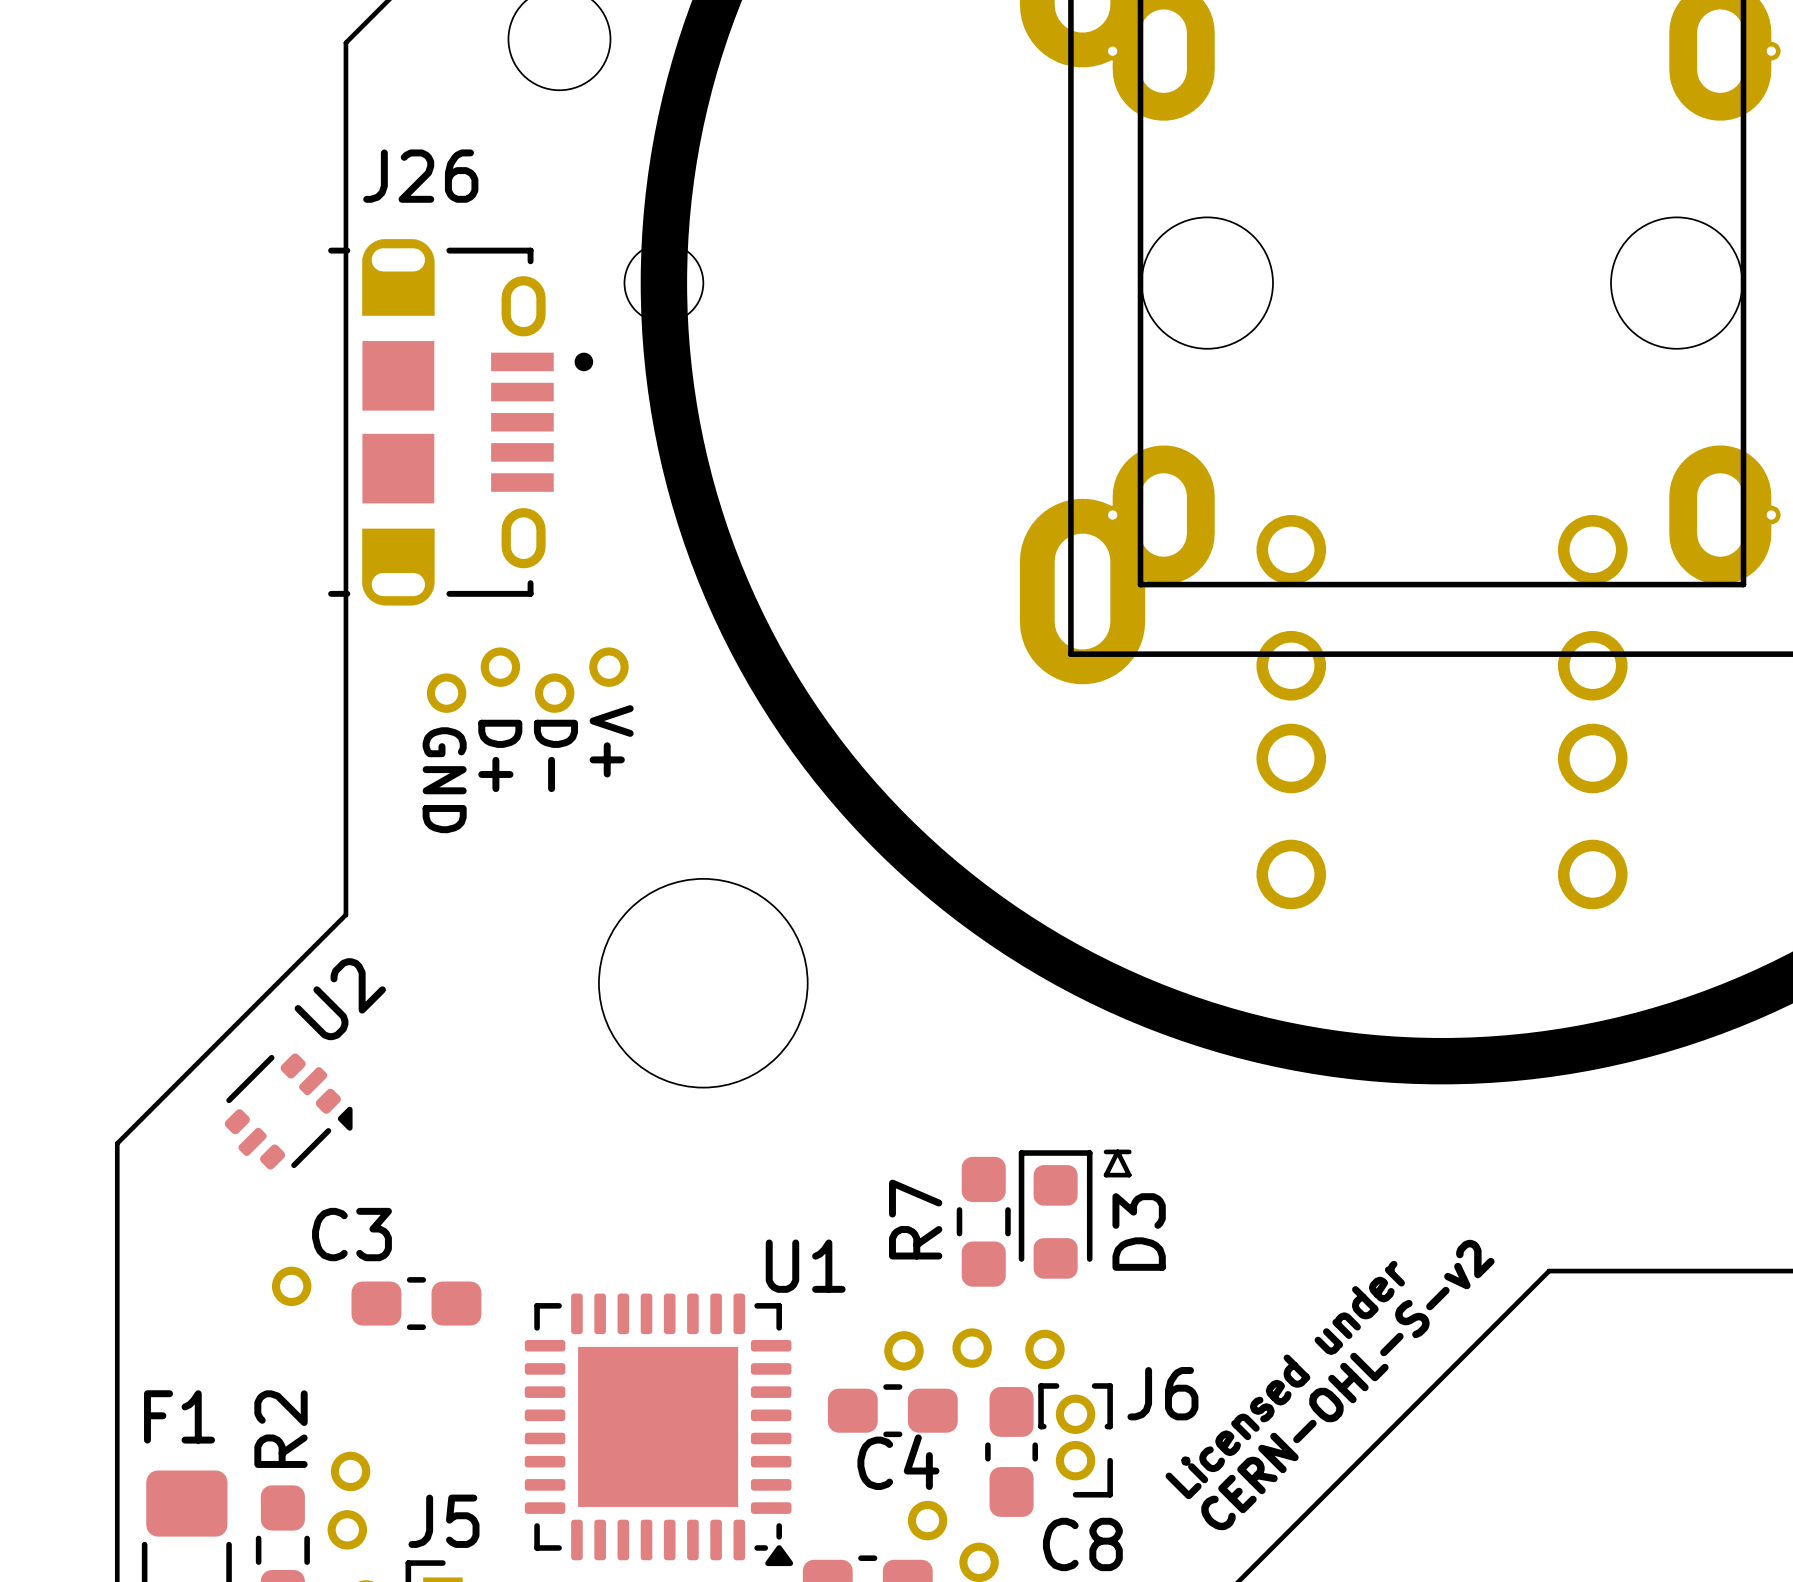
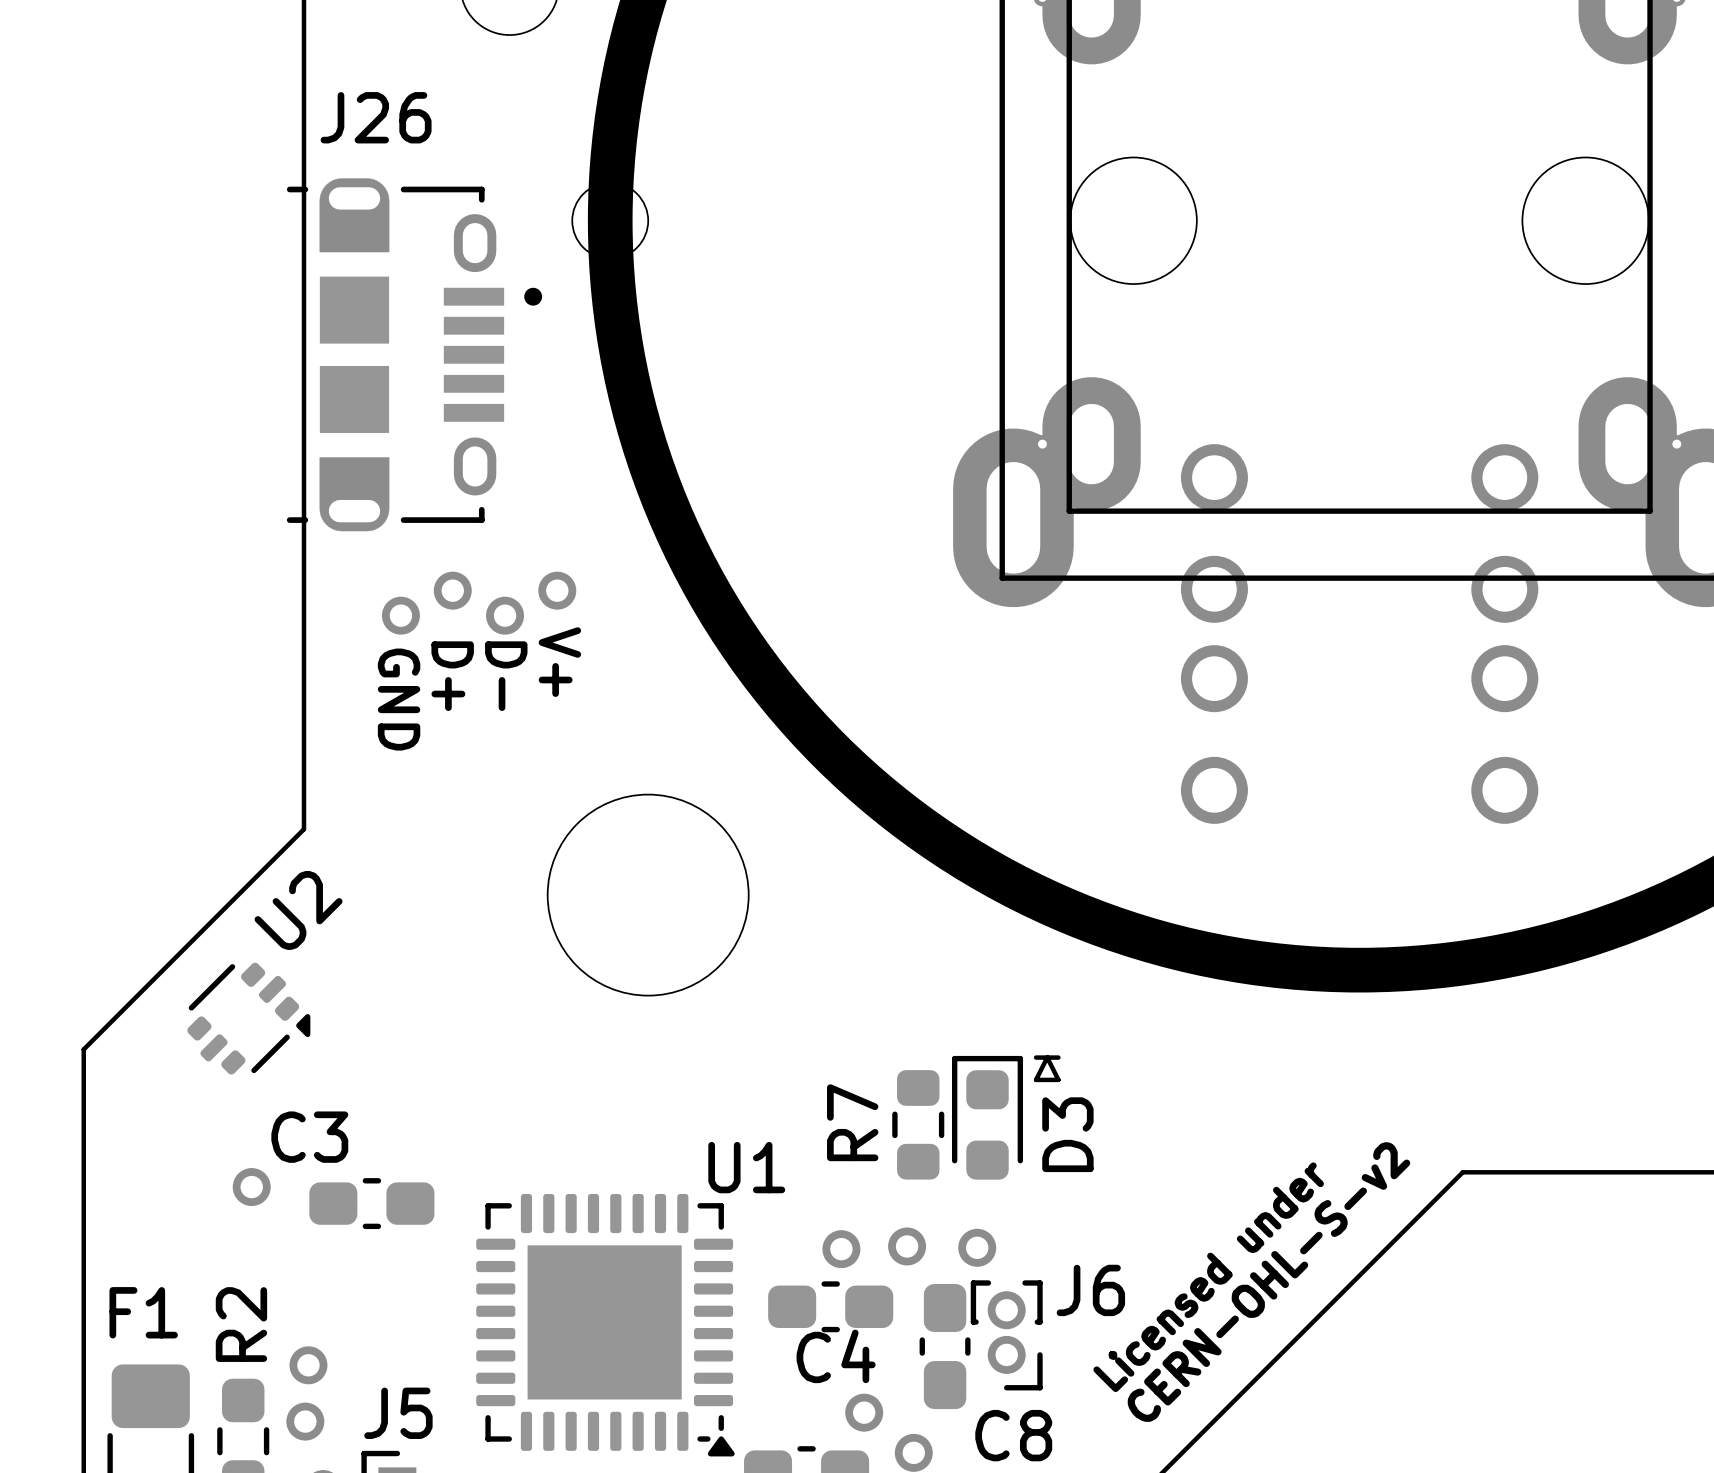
R7 footprint: [956, 1156, 1011, 1287] -> [892, 1070, 945, 1180]

